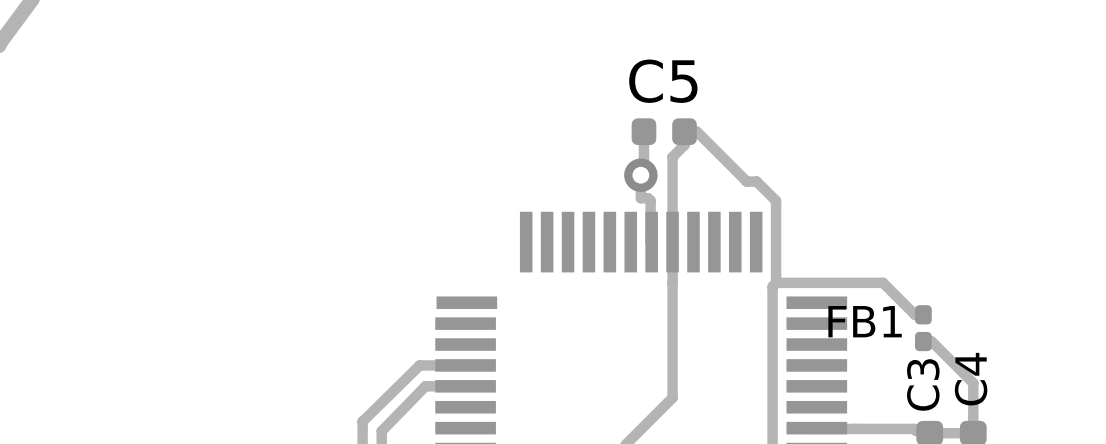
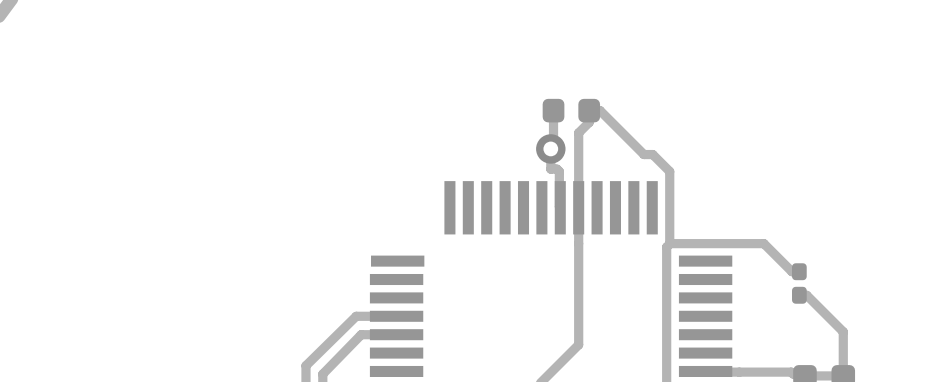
C5 name: C5 (663, 81) -> none
FB1 name: FB1 (865, 321) -> none
C4 name: C4 (971, 379) -> none
C3 name: C3 (923, 384) -> none

